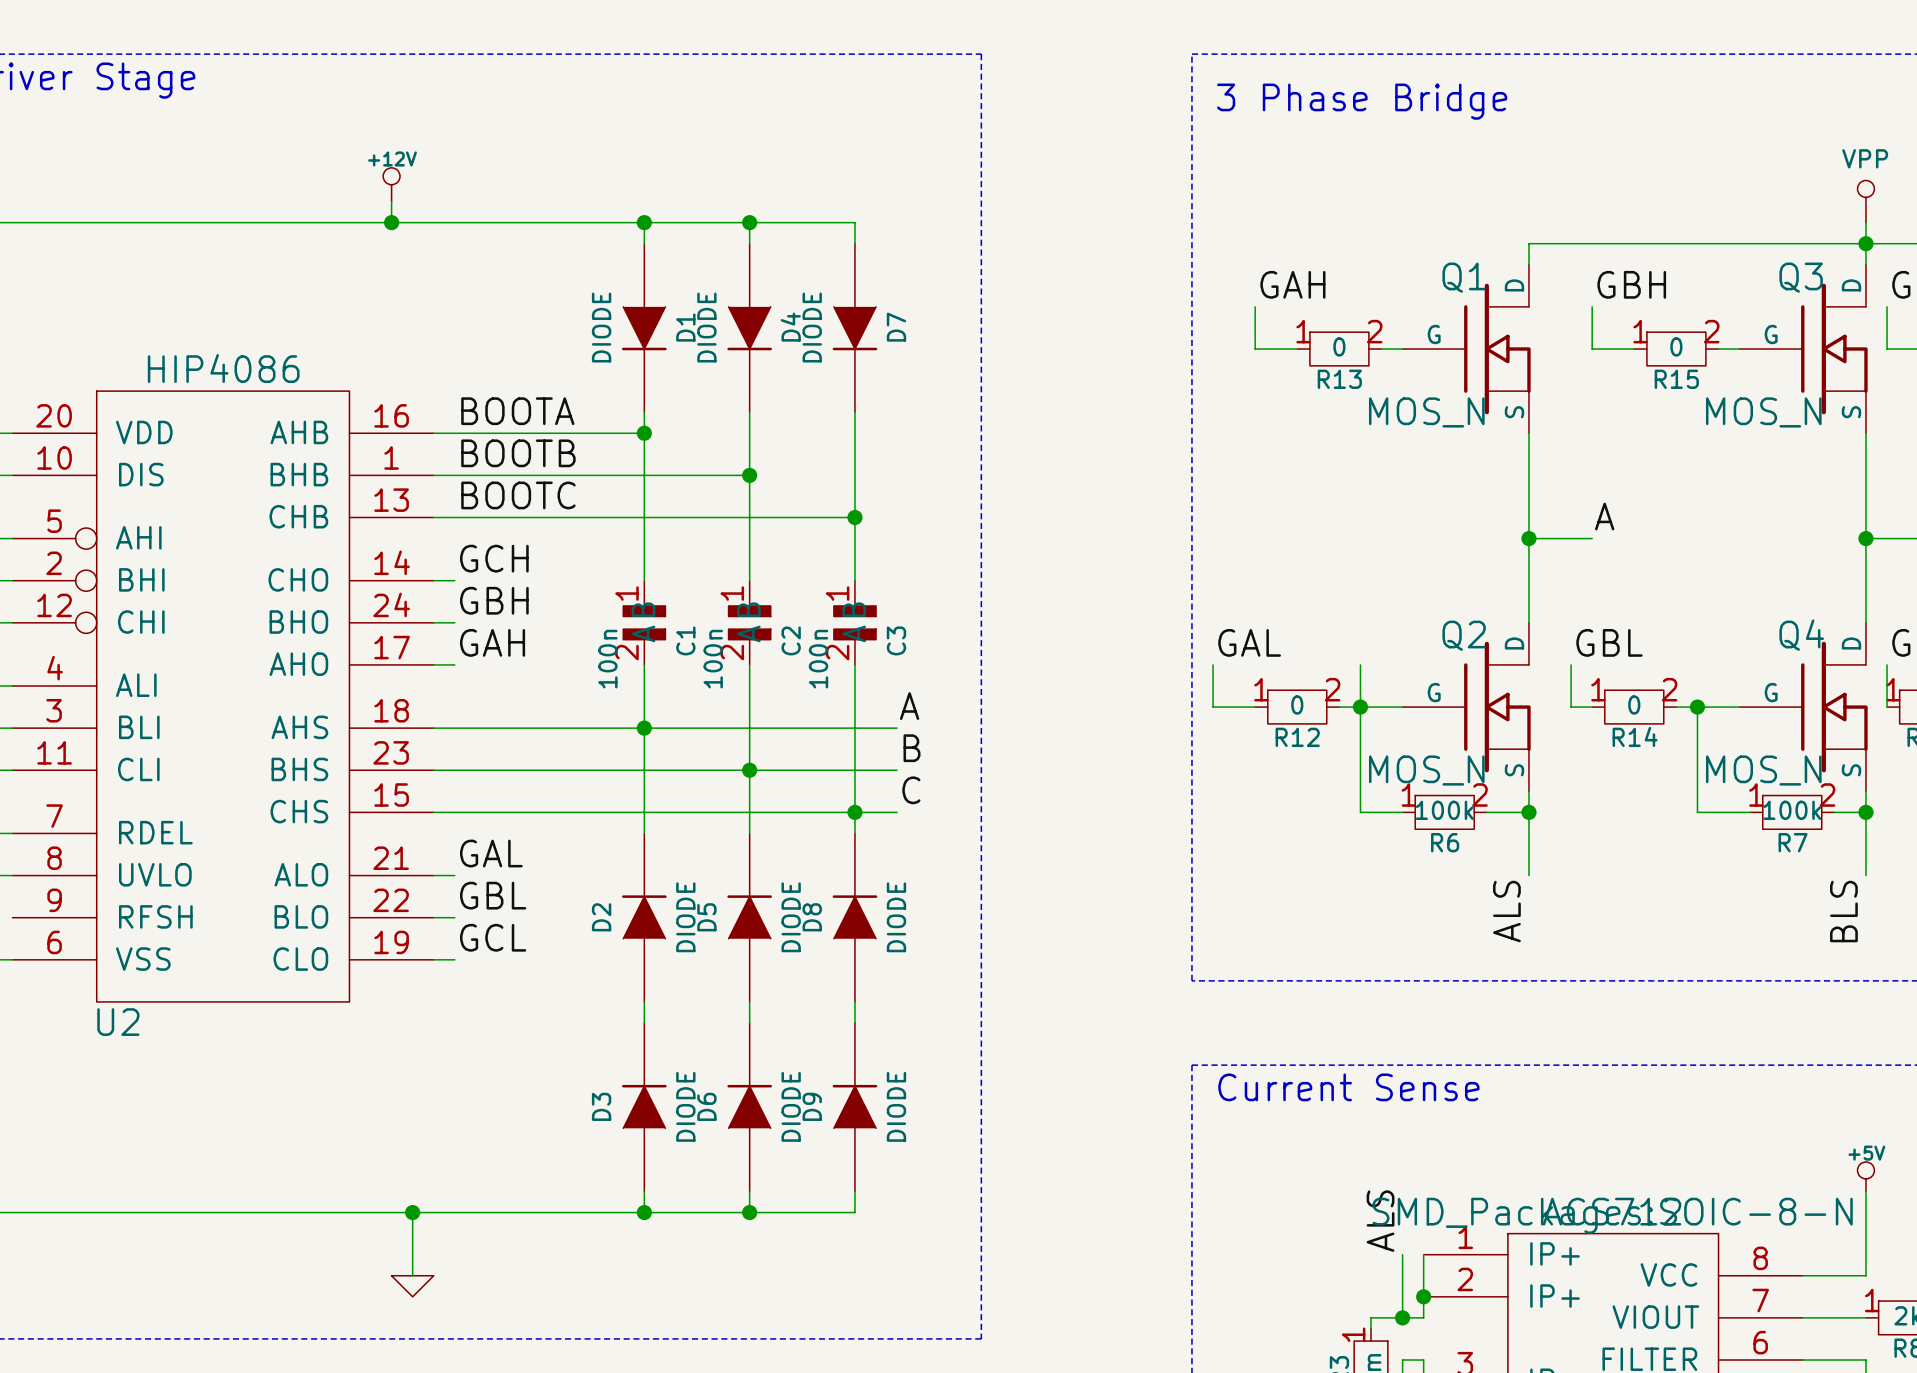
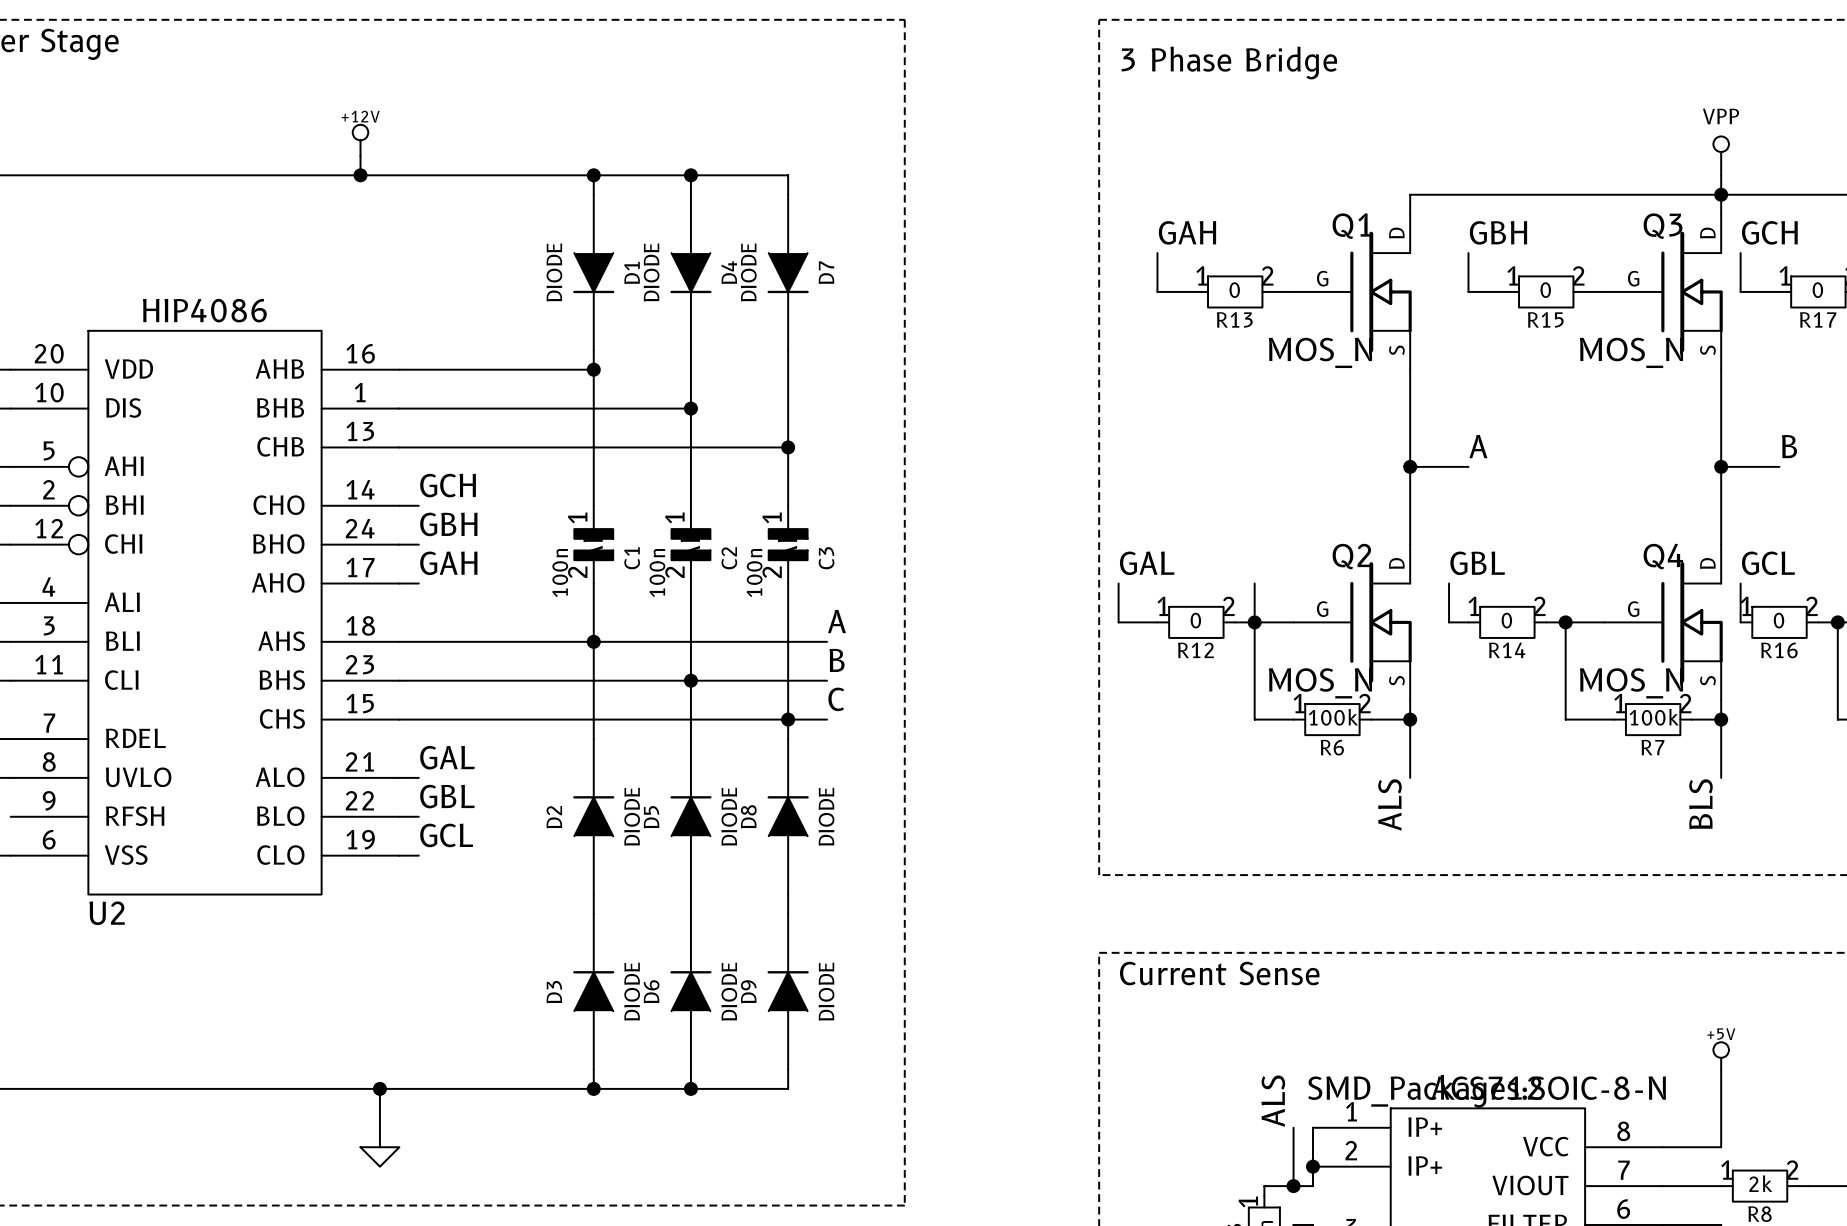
label: BOOTA (517, 411) -> none
label: BOOTB (518, 453) -> none
label: BOOTC (518, 495) -> none

